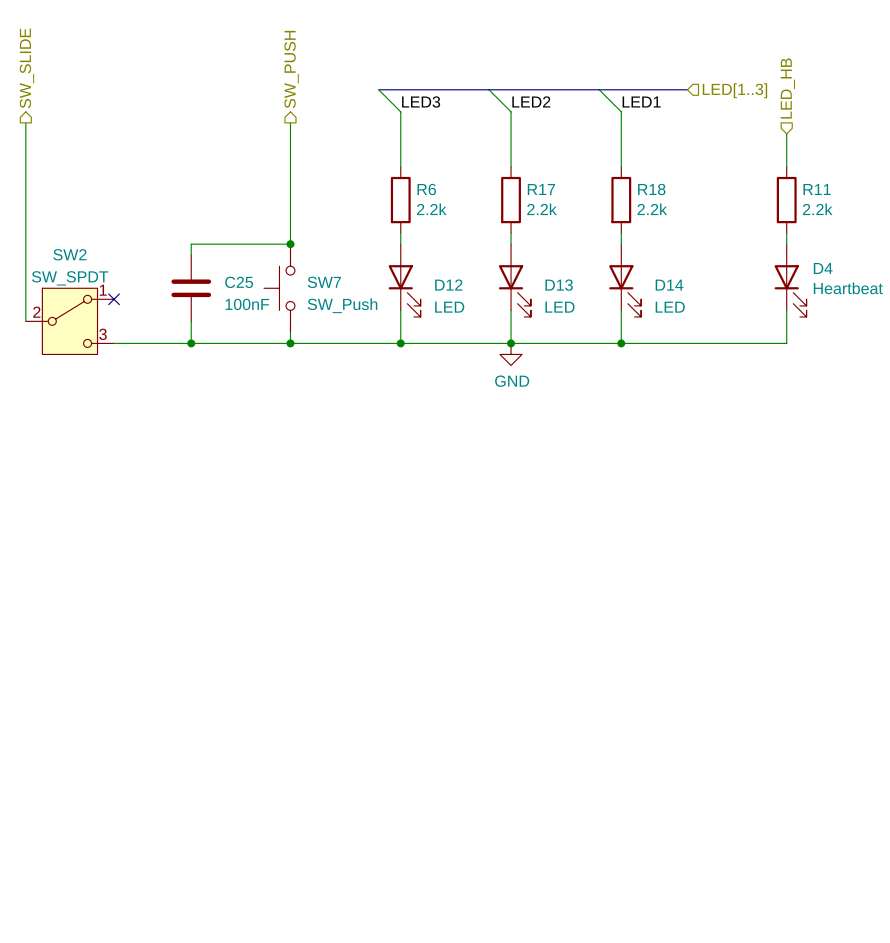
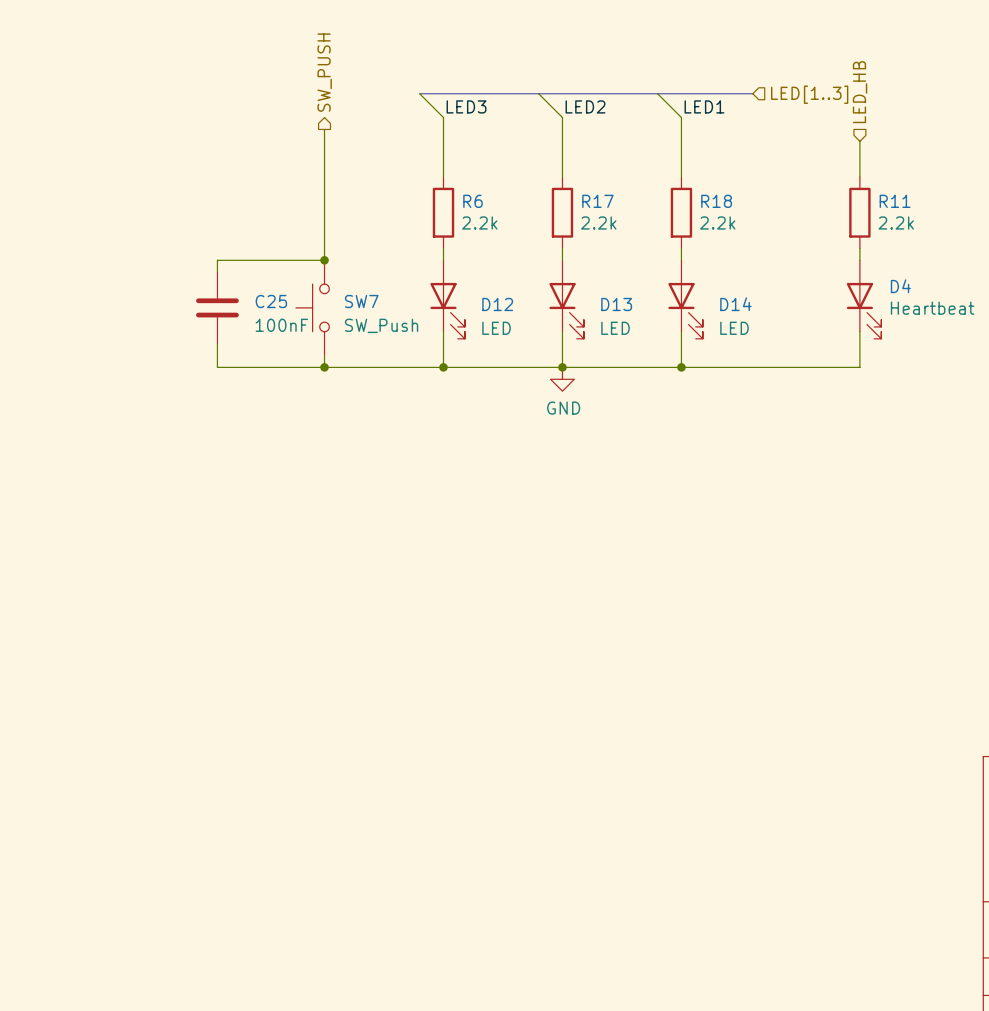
hierarchical label: SW_SLIDE (26, 68) -> none
wire: (25, 122) (25, 321) -> none
no-connect mark: (114, 299) -> none
SW2: SW_SPDT (69, 321) -> none
wire: (114, 343) (191, 343) -> none
junction: (191, 343) -> none

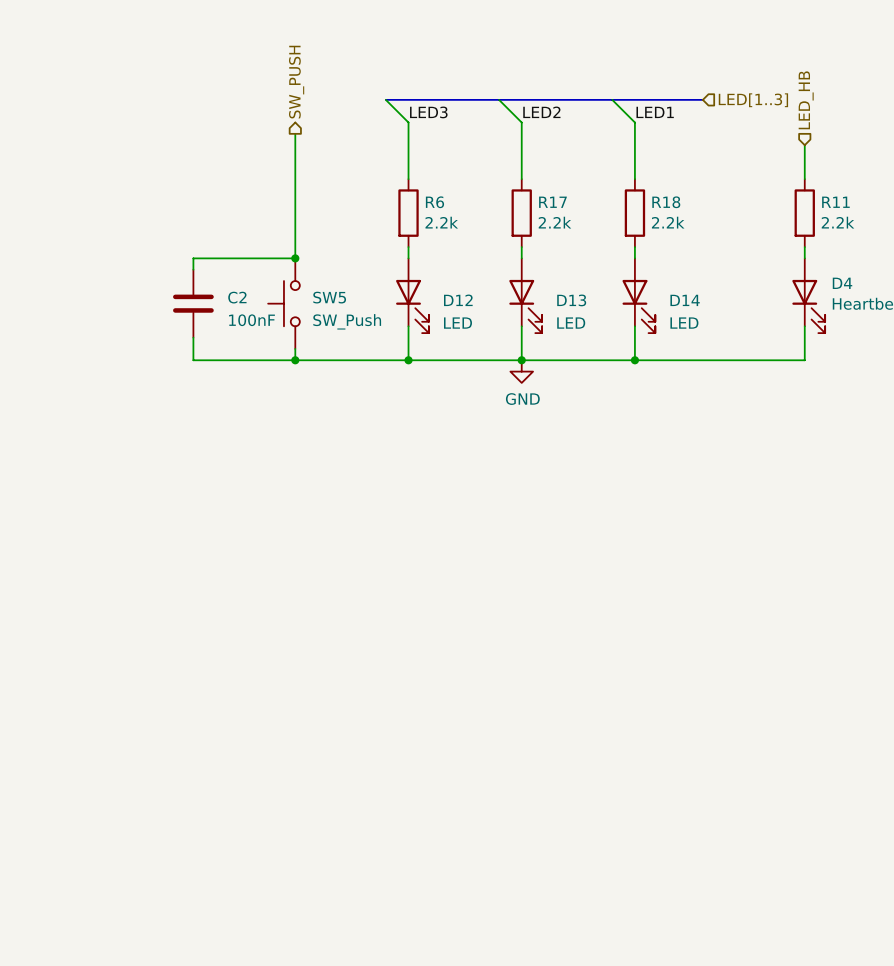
C25 name: C25 (271, 301) -> C2 (237, 297)
SW7 name: SW7 (361, 301) -> SW5 (329, 297)

